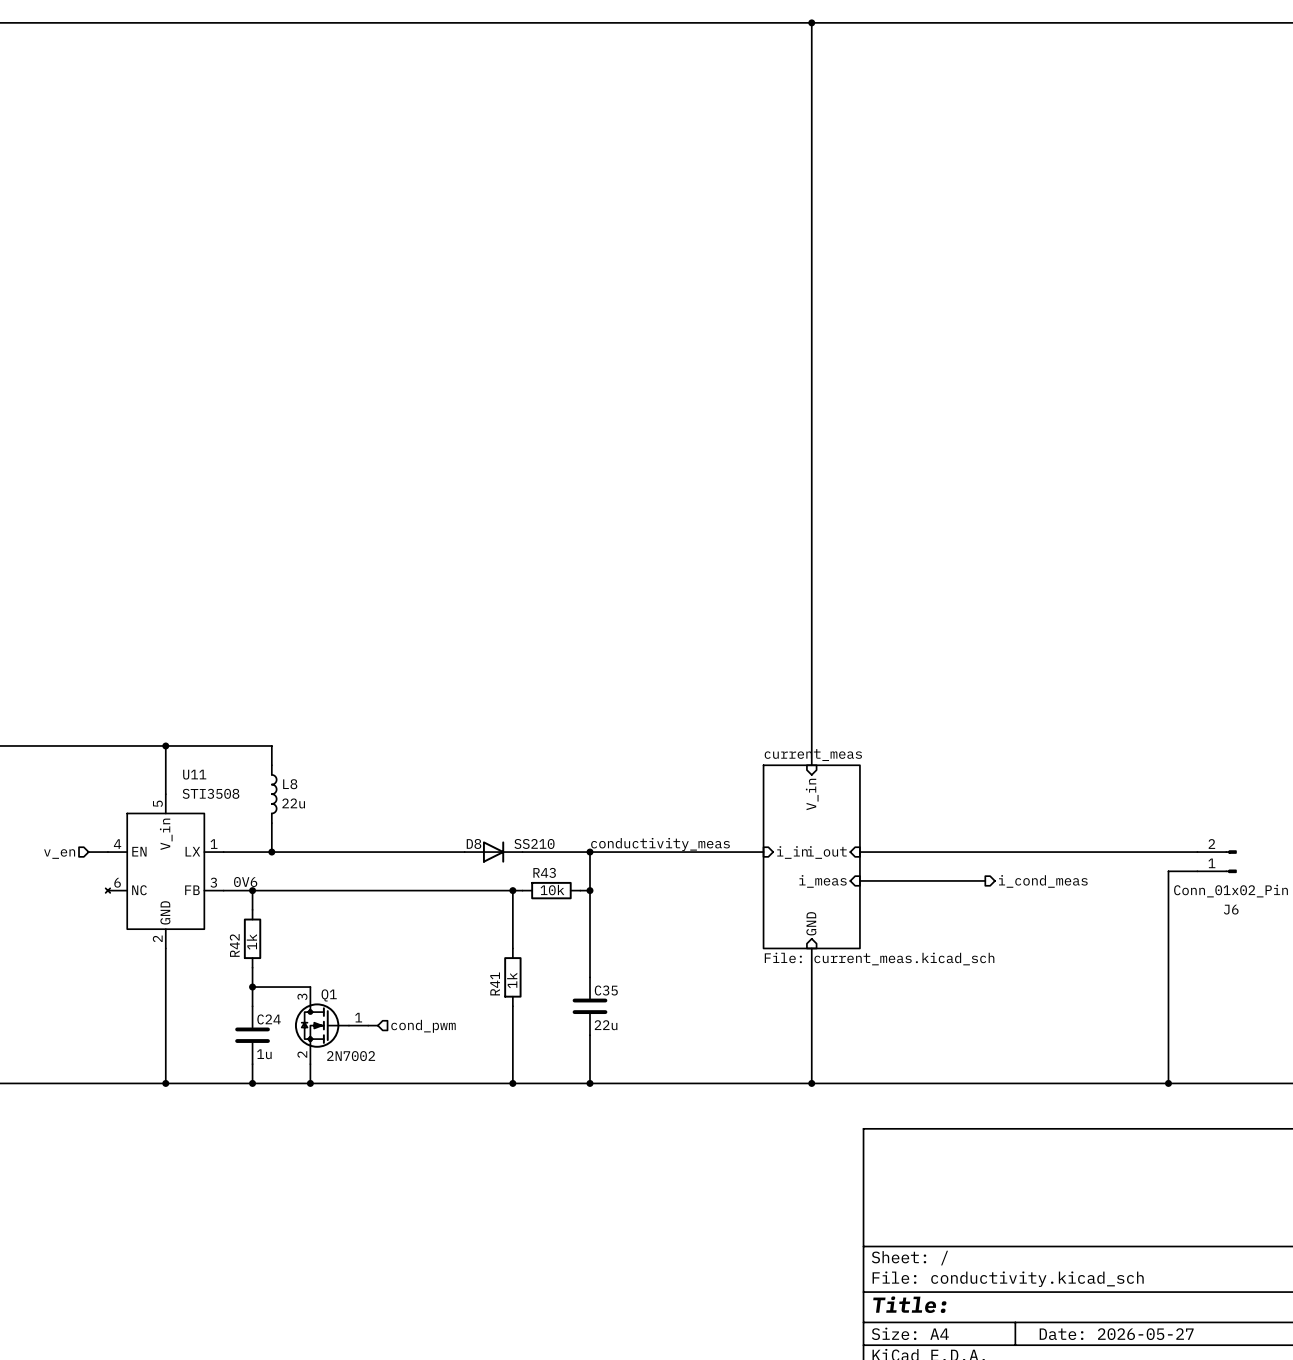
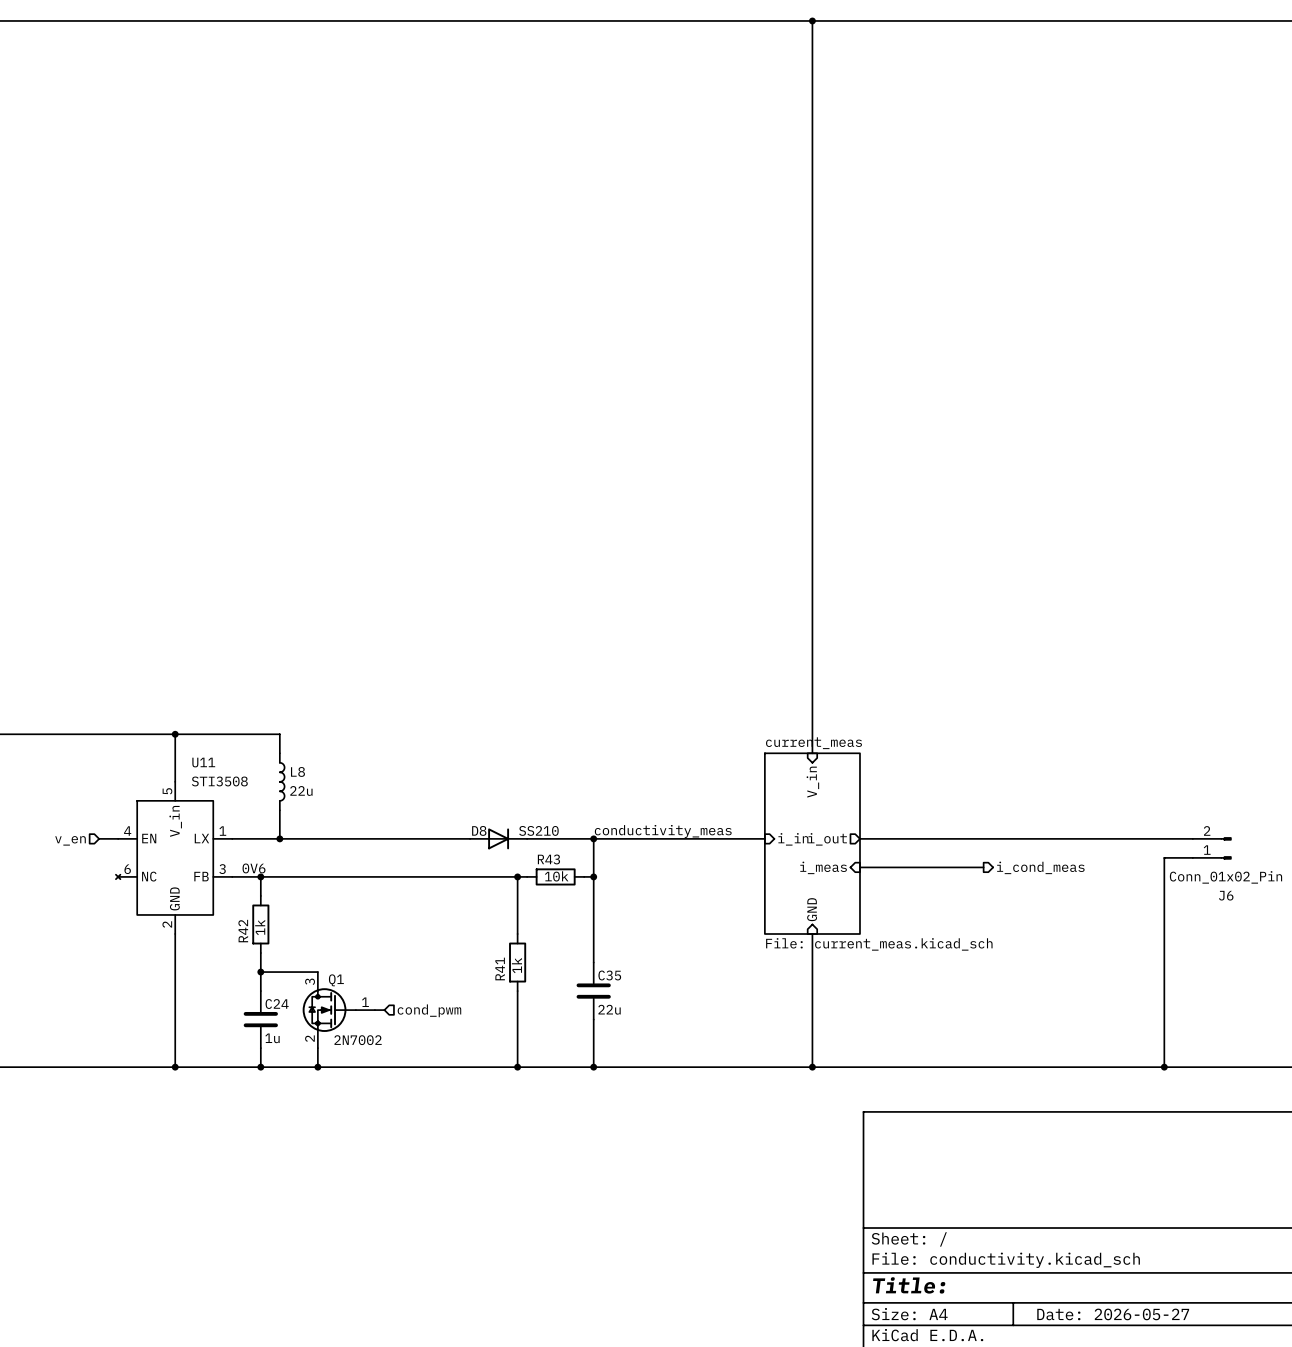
sheet pin shape: input (827, 852) -> output (827, 839)

